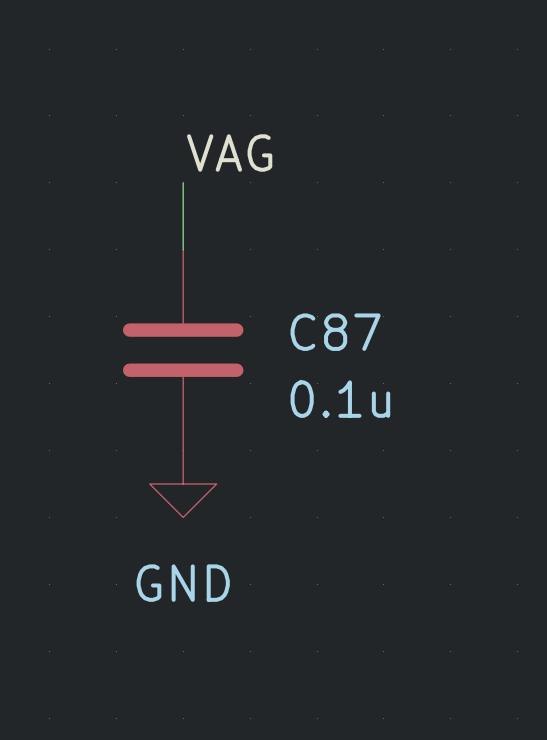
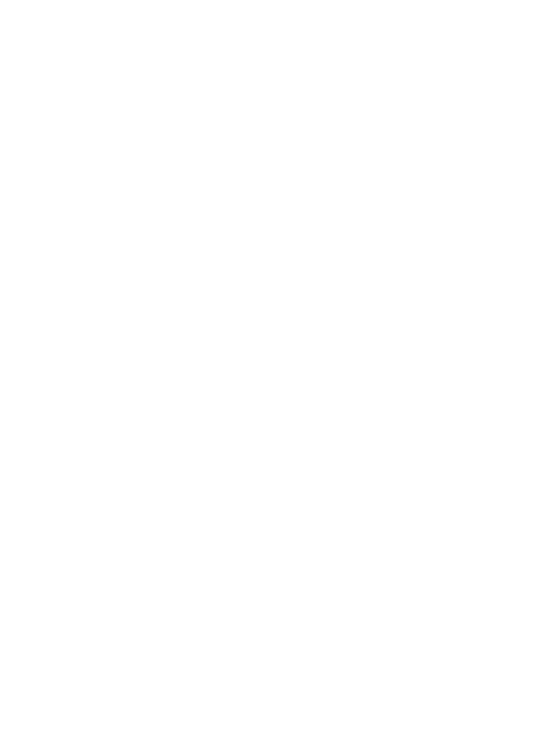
label: VAG (229, 153) -> none
wire: (183, 182) (183, 249) -> none
C87: 0.1u (183, 350) -> none
power symbol: GND (183, 483) -> none

